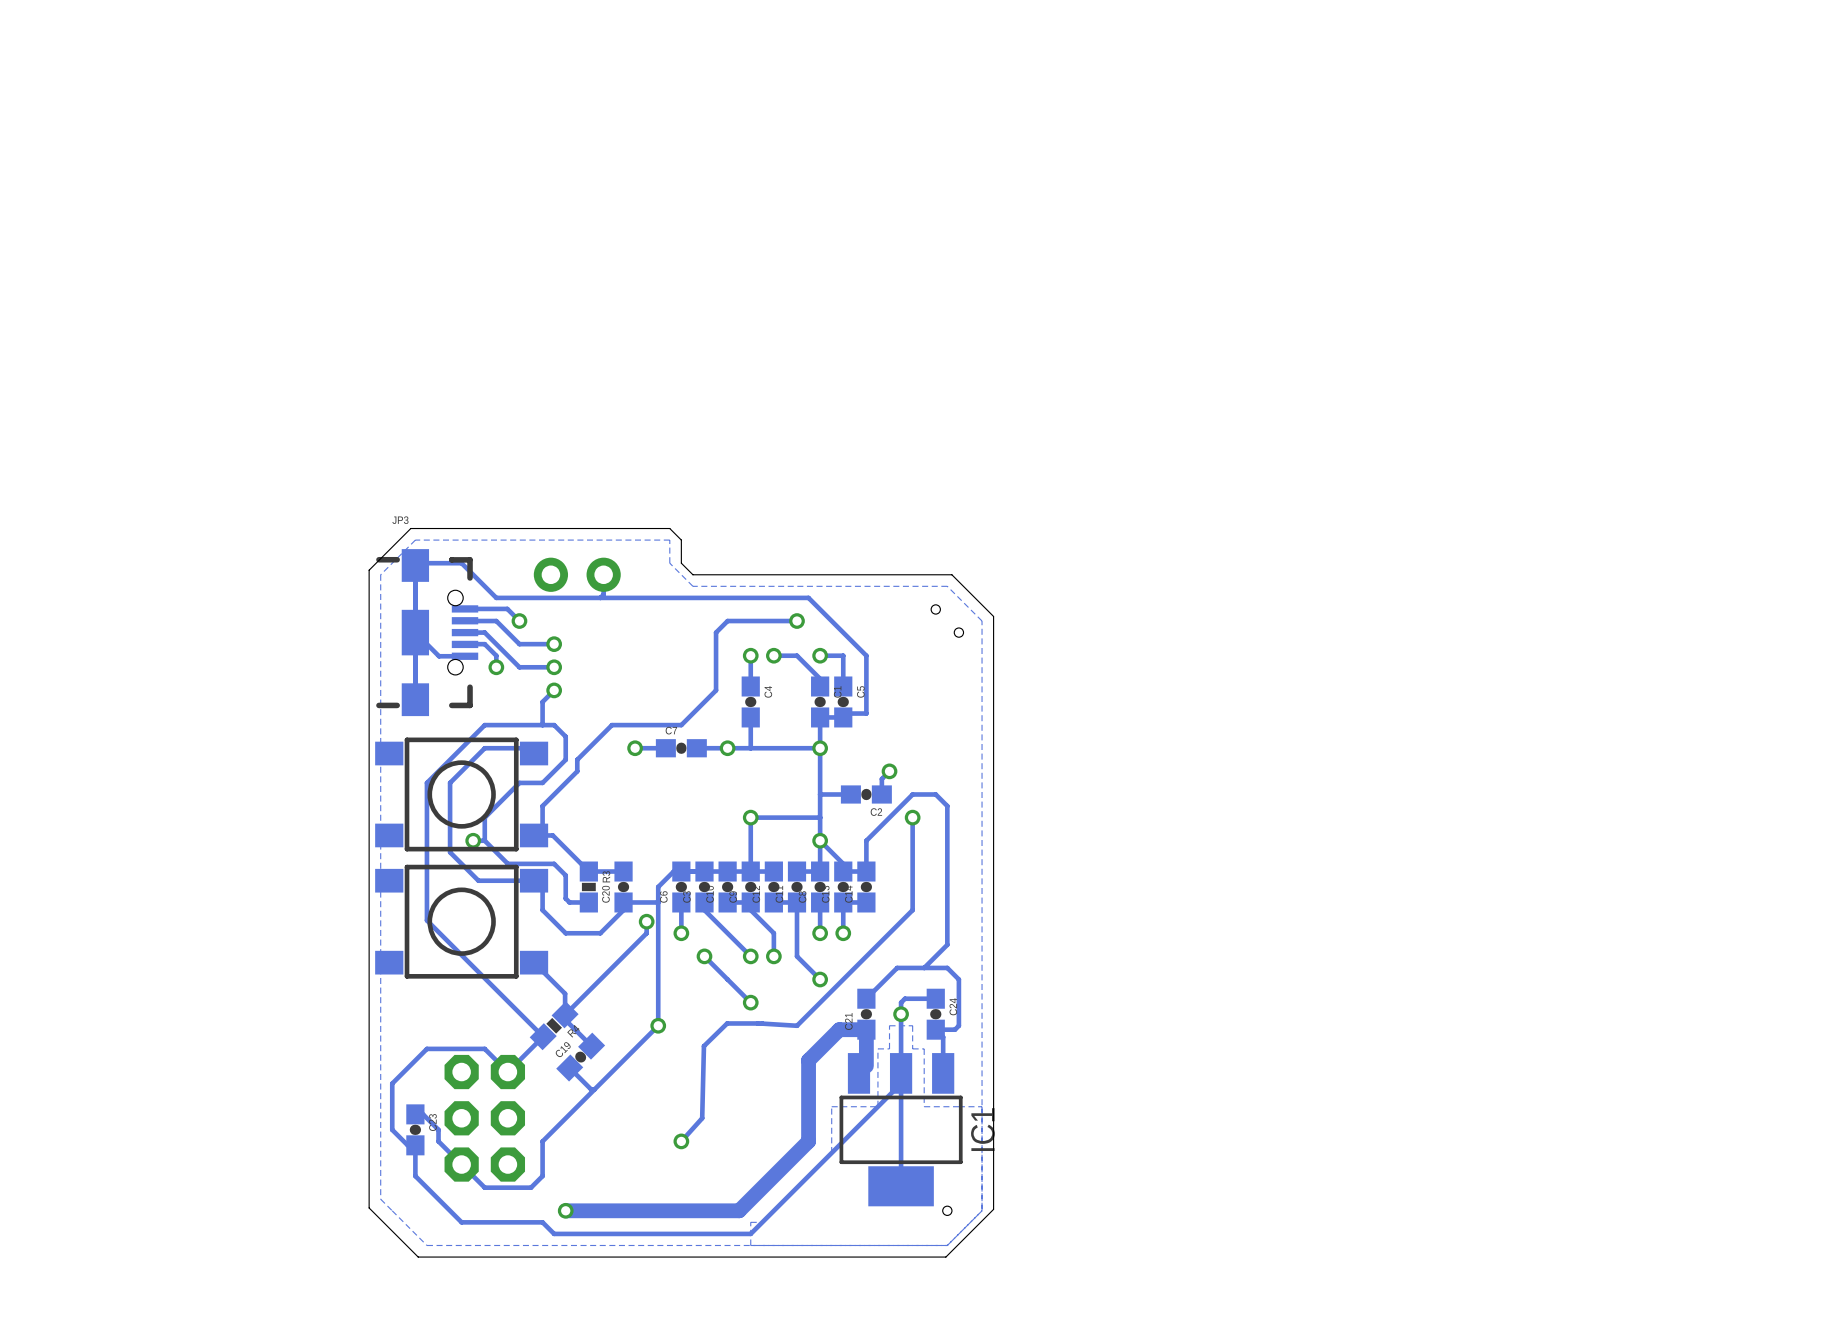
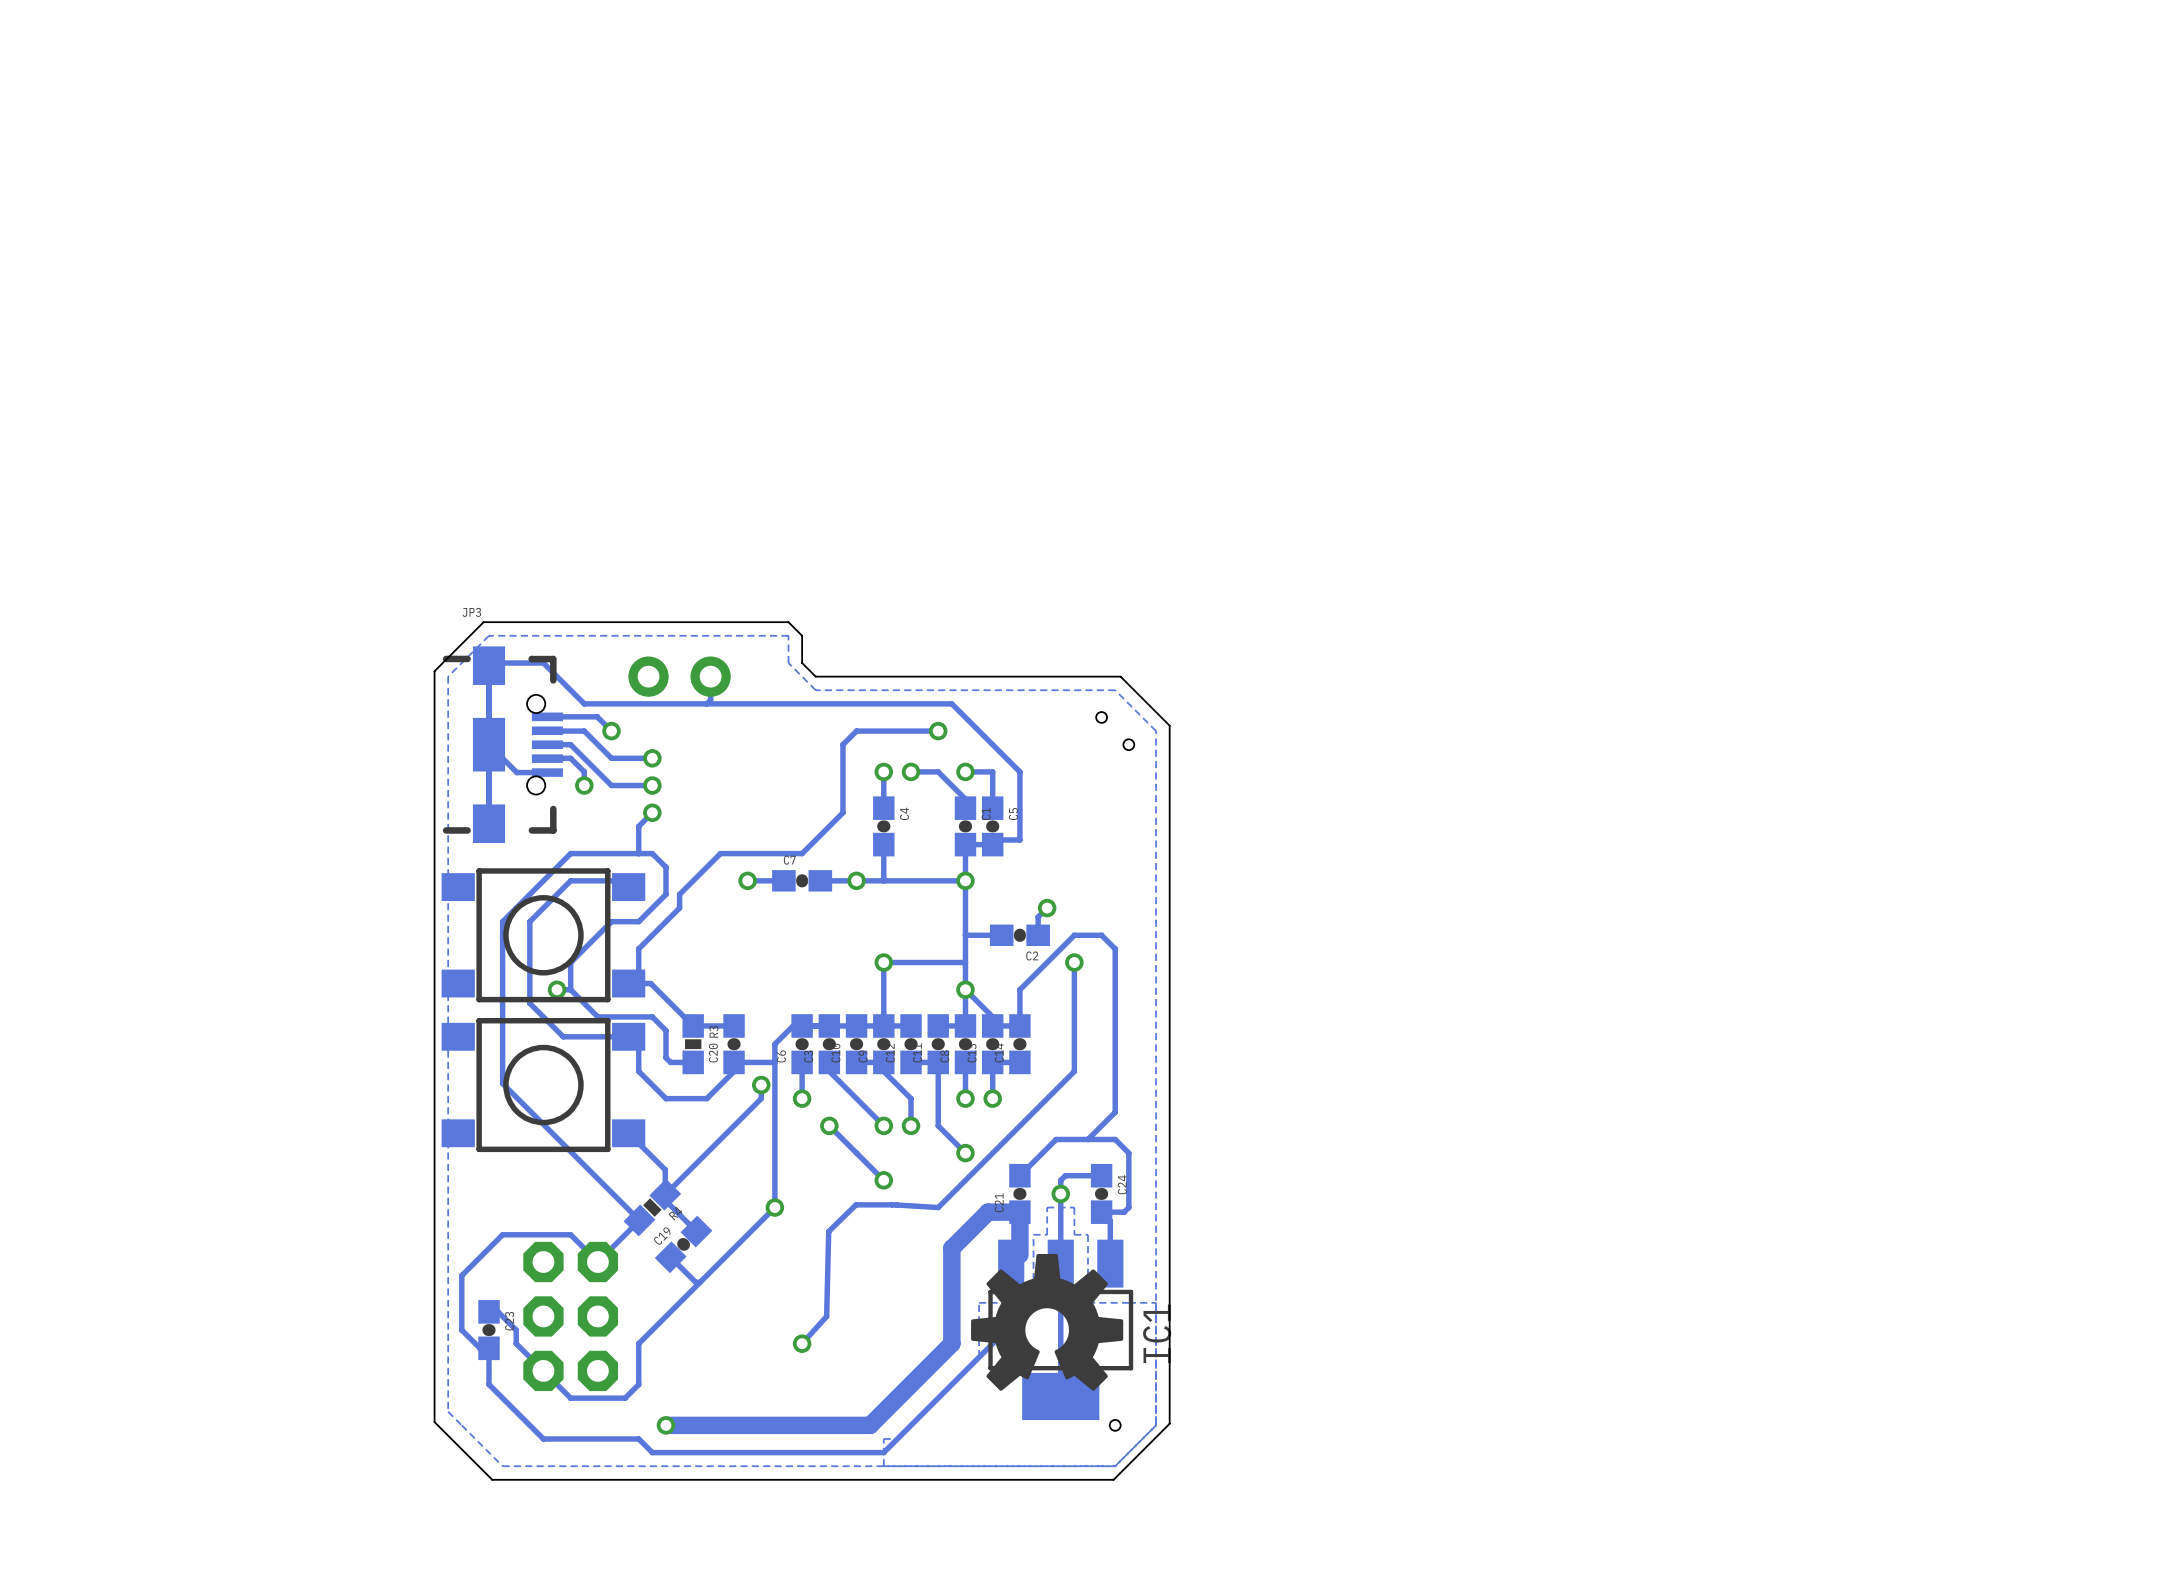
drawing: none -> [971, 1253, 1124, 1391]

